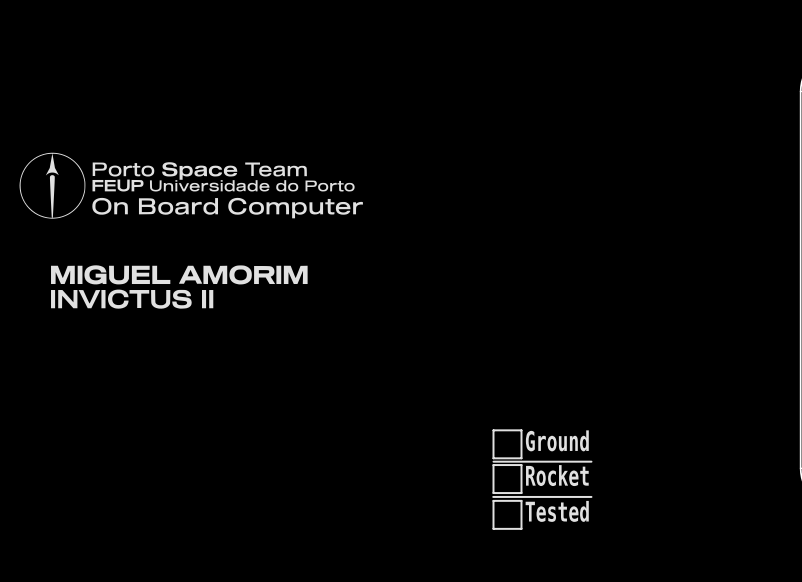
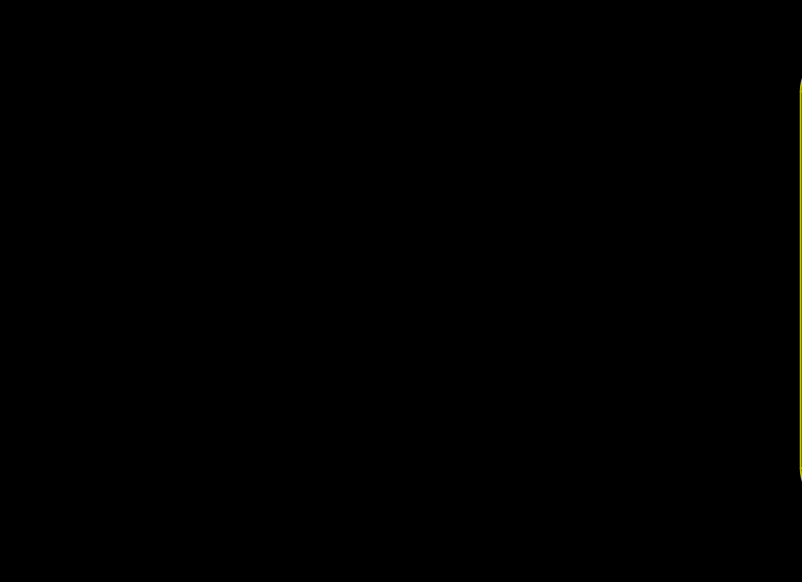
drawing: [19, 152, 363, 219] -> none
drawing: [51, 265, 308, 309] -> none
line: (493, 430) (493, 458) (521, 458) (521, 430) (493, 430) -> none
text: Ground (557, 440) -> none
line: (493, 461) (591, 461) -> none
line: (493, 465) (521, 465) (521, 493) (493, 493) (493, 465) -> none
text: Rocket (557, 475) -> none
line: (493, 496) (591, 496) -> none
line: (493, 500) (493, 528) (521, 528) (521, 500) (493, 500) -> none
text: Tested (557, 511) -> none

